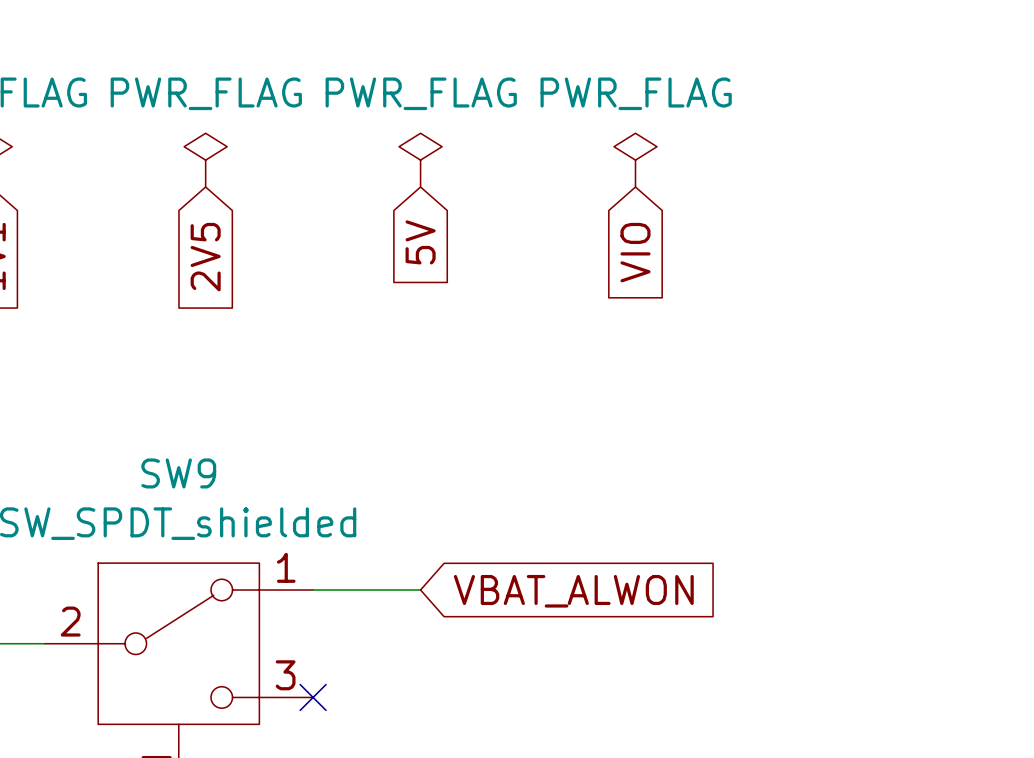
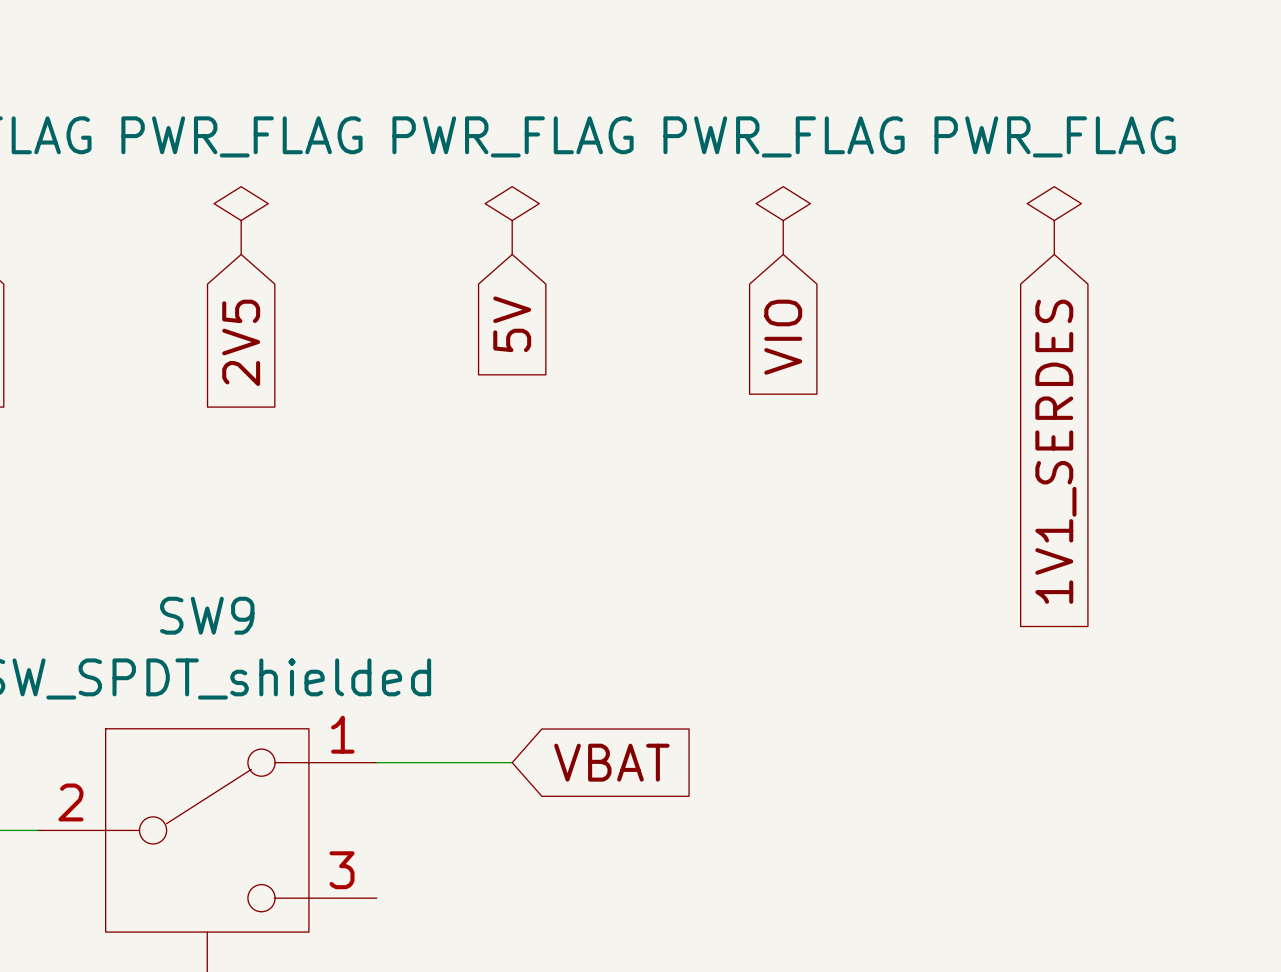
power symbol: none -> PWR_FLAG (1054, 220)
global label: none -> 1V1_SERDES (1055, 451)
global label: VBAT_ALWON (573, 591) -> VBAT (611, 762)
no-connect mark: (313, 697) -> none

